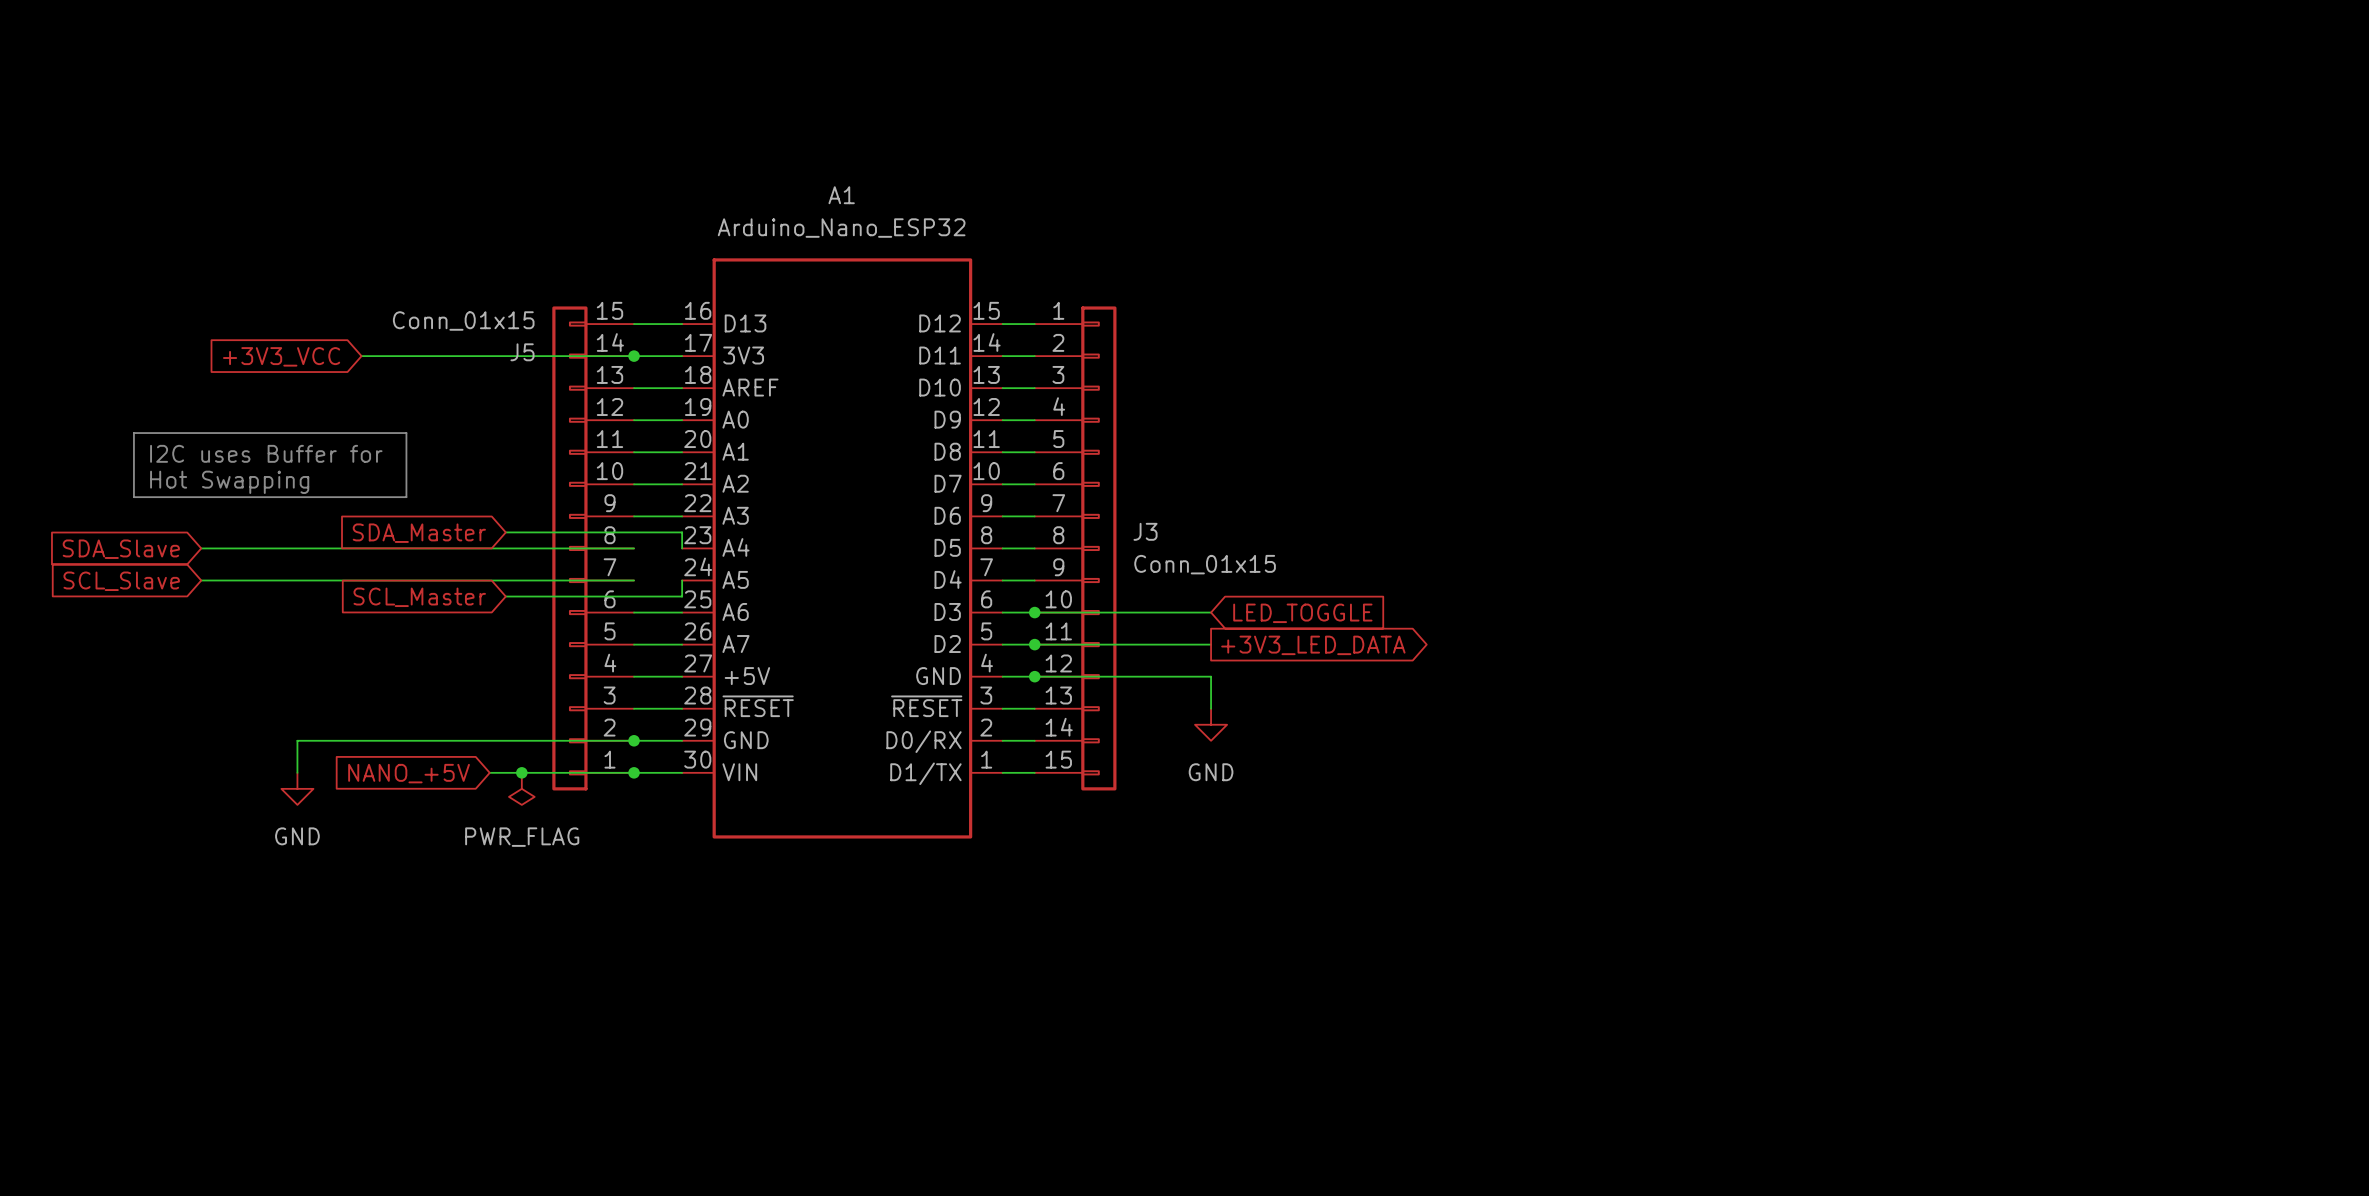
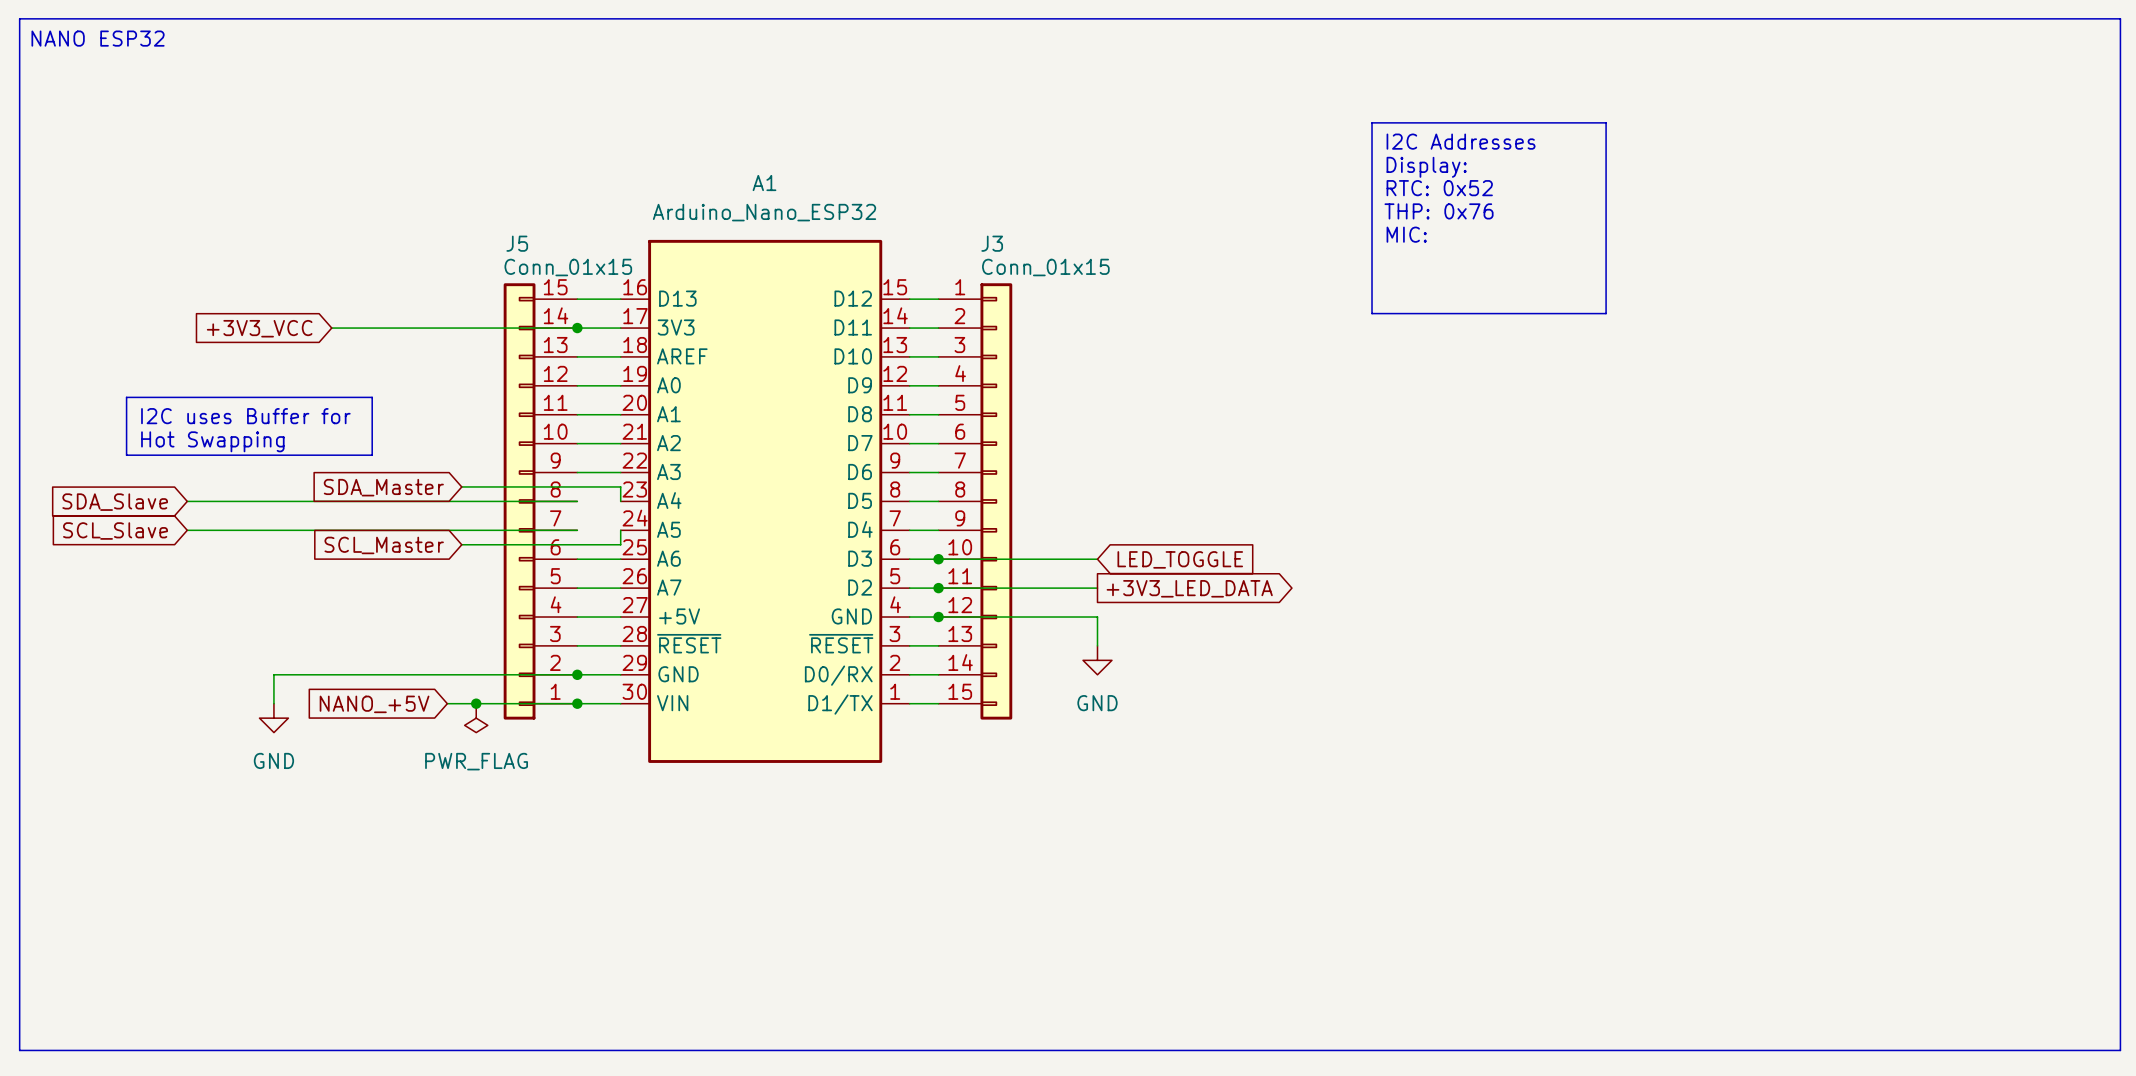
line: none -> (19, 18) (2120, 18) (2120, 1050) (19, 1050) (19, 18)
text: none -> NANO ESP32 (98, 38)
line: none -> (1372, 122) (1606, 122) (1606, 313) (1372, 313) (1372, 122)
text: none -> I2C Addresses (1461, 141)
text: none -> Display: (1426, 167)
text: none -> RTC: 0x52 (1439, 188)
text: none -> THP: 0x76 (1439, 211)
text: none -> MIC: (1406, 234)
J5 value position: Conn_01x15 (463, 321) -> Conn_01x15 (568, 267)
J5 name position: J5 (522, 352) -> J5 (517, 243)
J3 name position: J3 (1145, 531) -> J3 (992, 243)
J3 value position: Conn_01x15 (1205, 564) -> Conn_01x15 (1045, 267)

